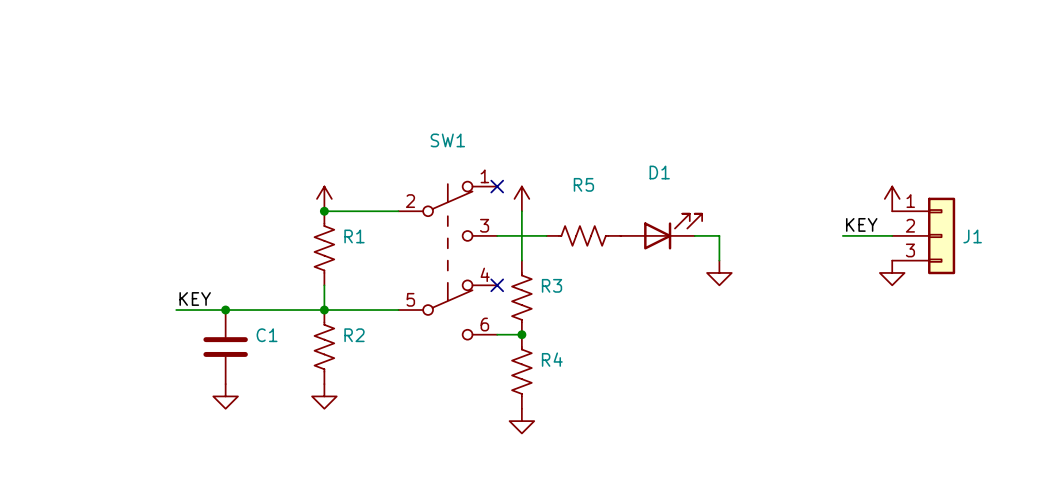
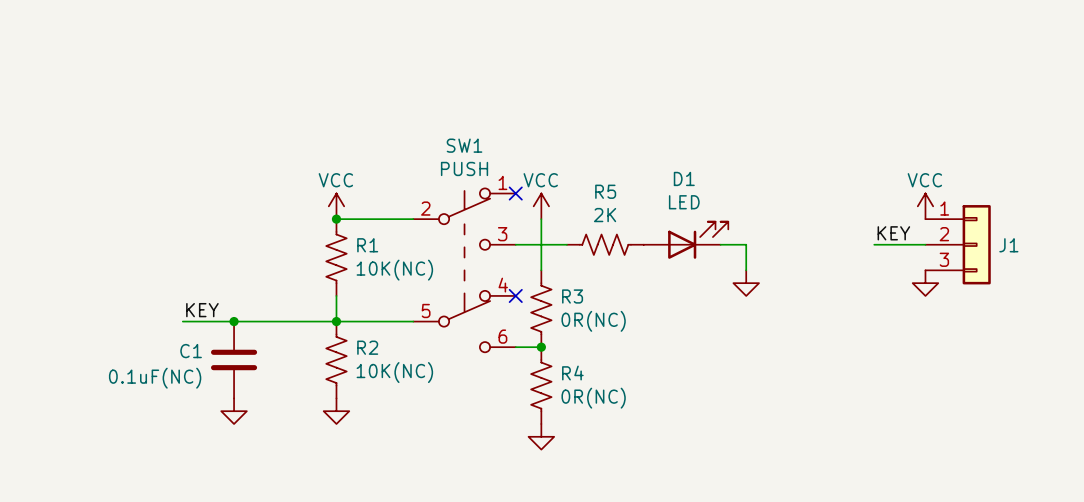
SW1 value: none -> PUSH (464, 168)
power symbol text: none -> VCC (335, 180)
power symbol text: none -> VCC (540, 180)
power symbol text: none -> VCC (924, 180)
D1 value: none -> LED (684, 202)
R5 value: none -> 2K (605, 215)
R1 value: none -> 10K(NC) (394, 270)
R3 value: none -> 0R(NC) (593, 321)
C1 name position: C1 (267, 335) -> C1 (191, 351)
R2 value: none -> 10K(NC) (394, 372)
C1 value: none -> 0.1uF(NC) (155, 378)
R4 value: none -> 0R(NC) (593, 398)

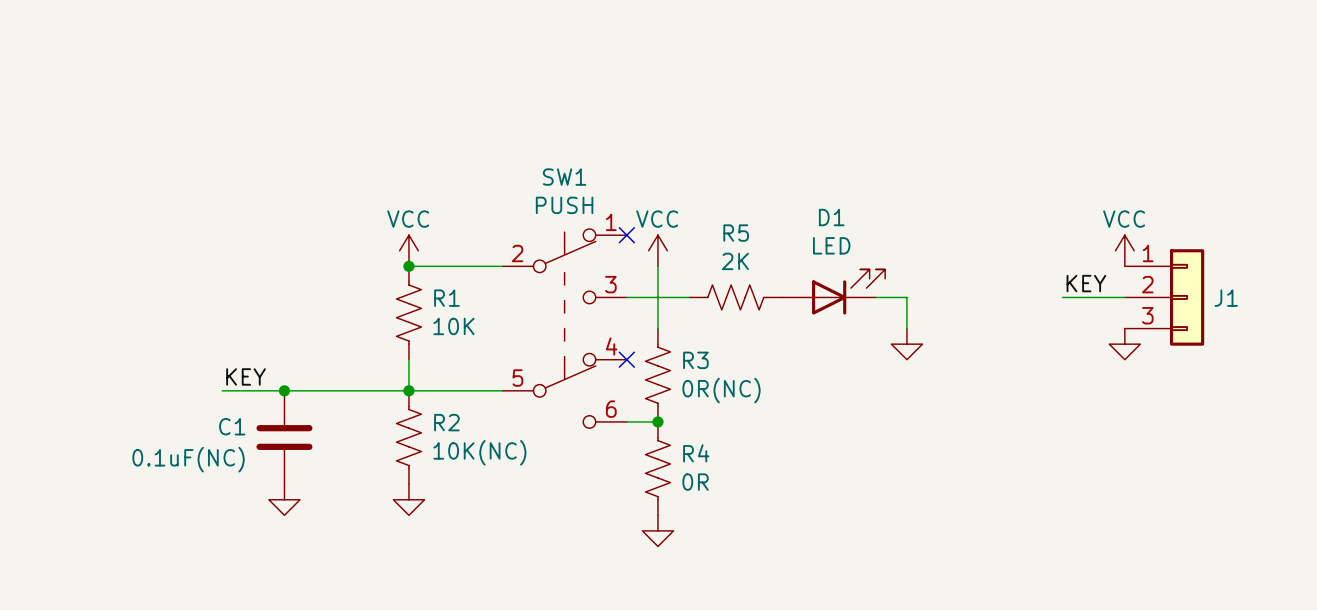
R1 value: 10K(NC) (394, 270) -> 10K (453, 326)
R4 value: 0R(NC) (593, 398) -> 0R (695, 482)

